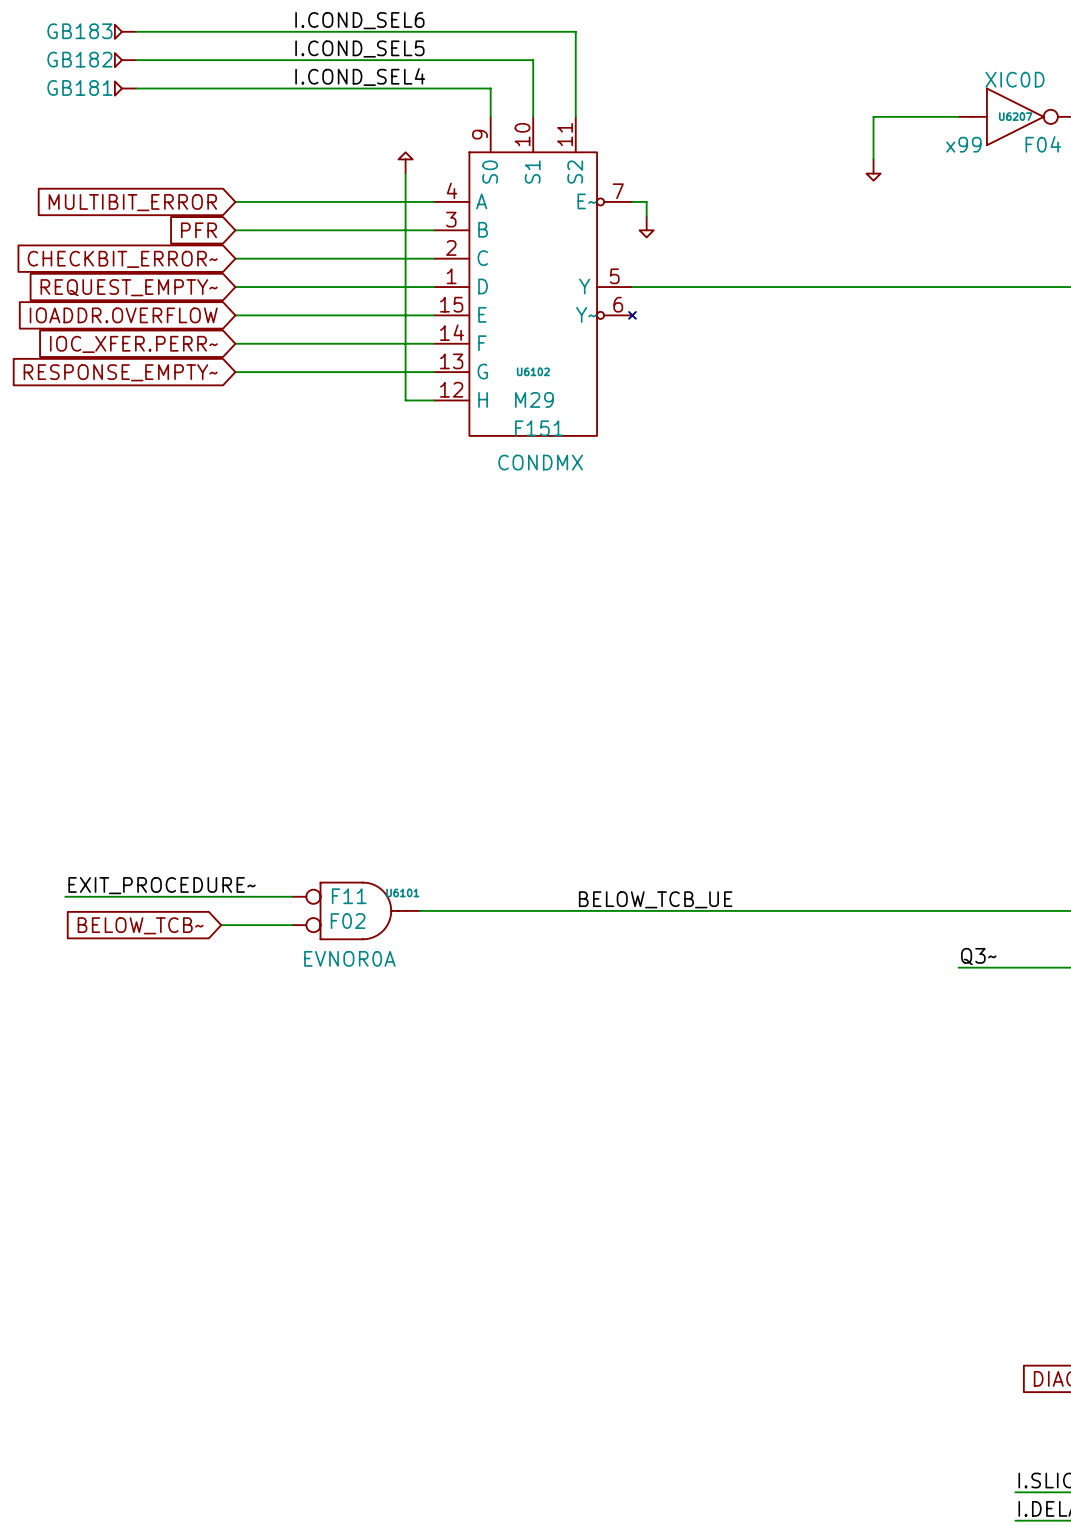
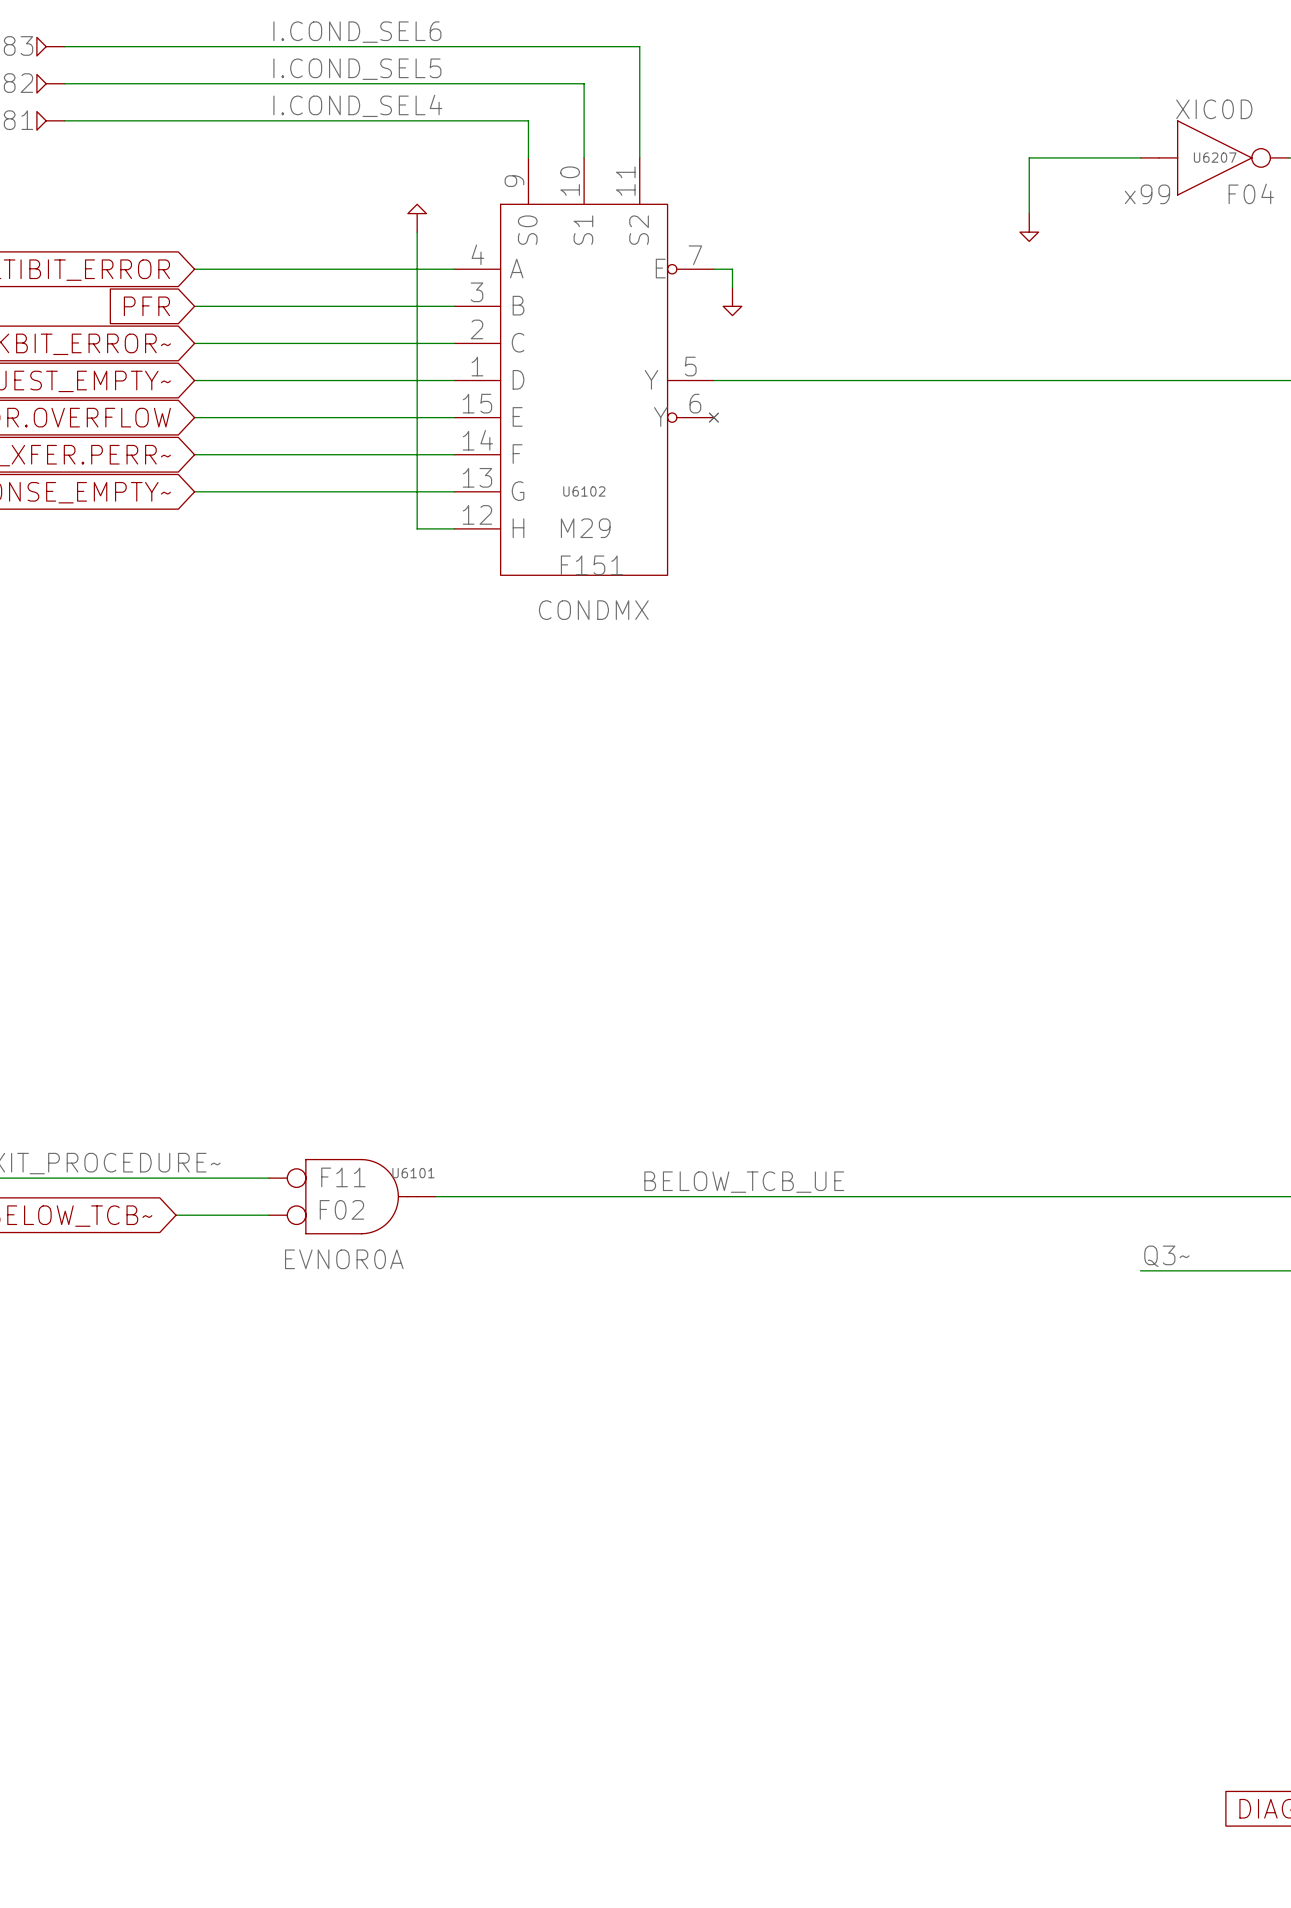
U6102 pin name: E~ (587, 201) -> E (660, 268)
U6102 pin name: Y~ (586, 314) -> Y (660, 416)

